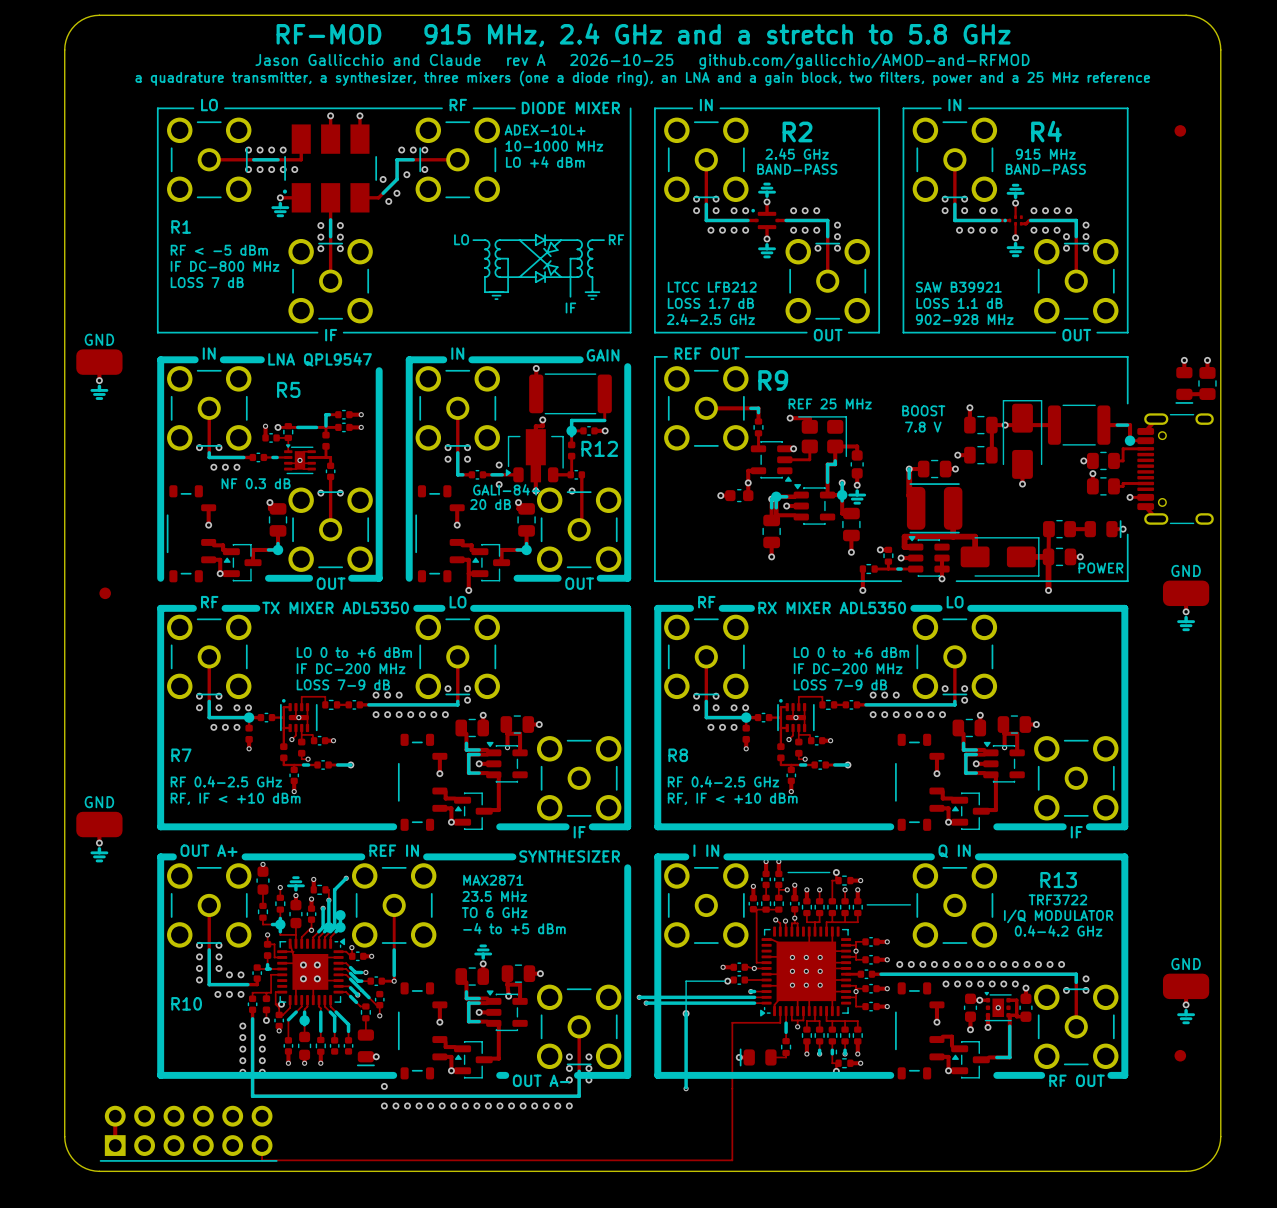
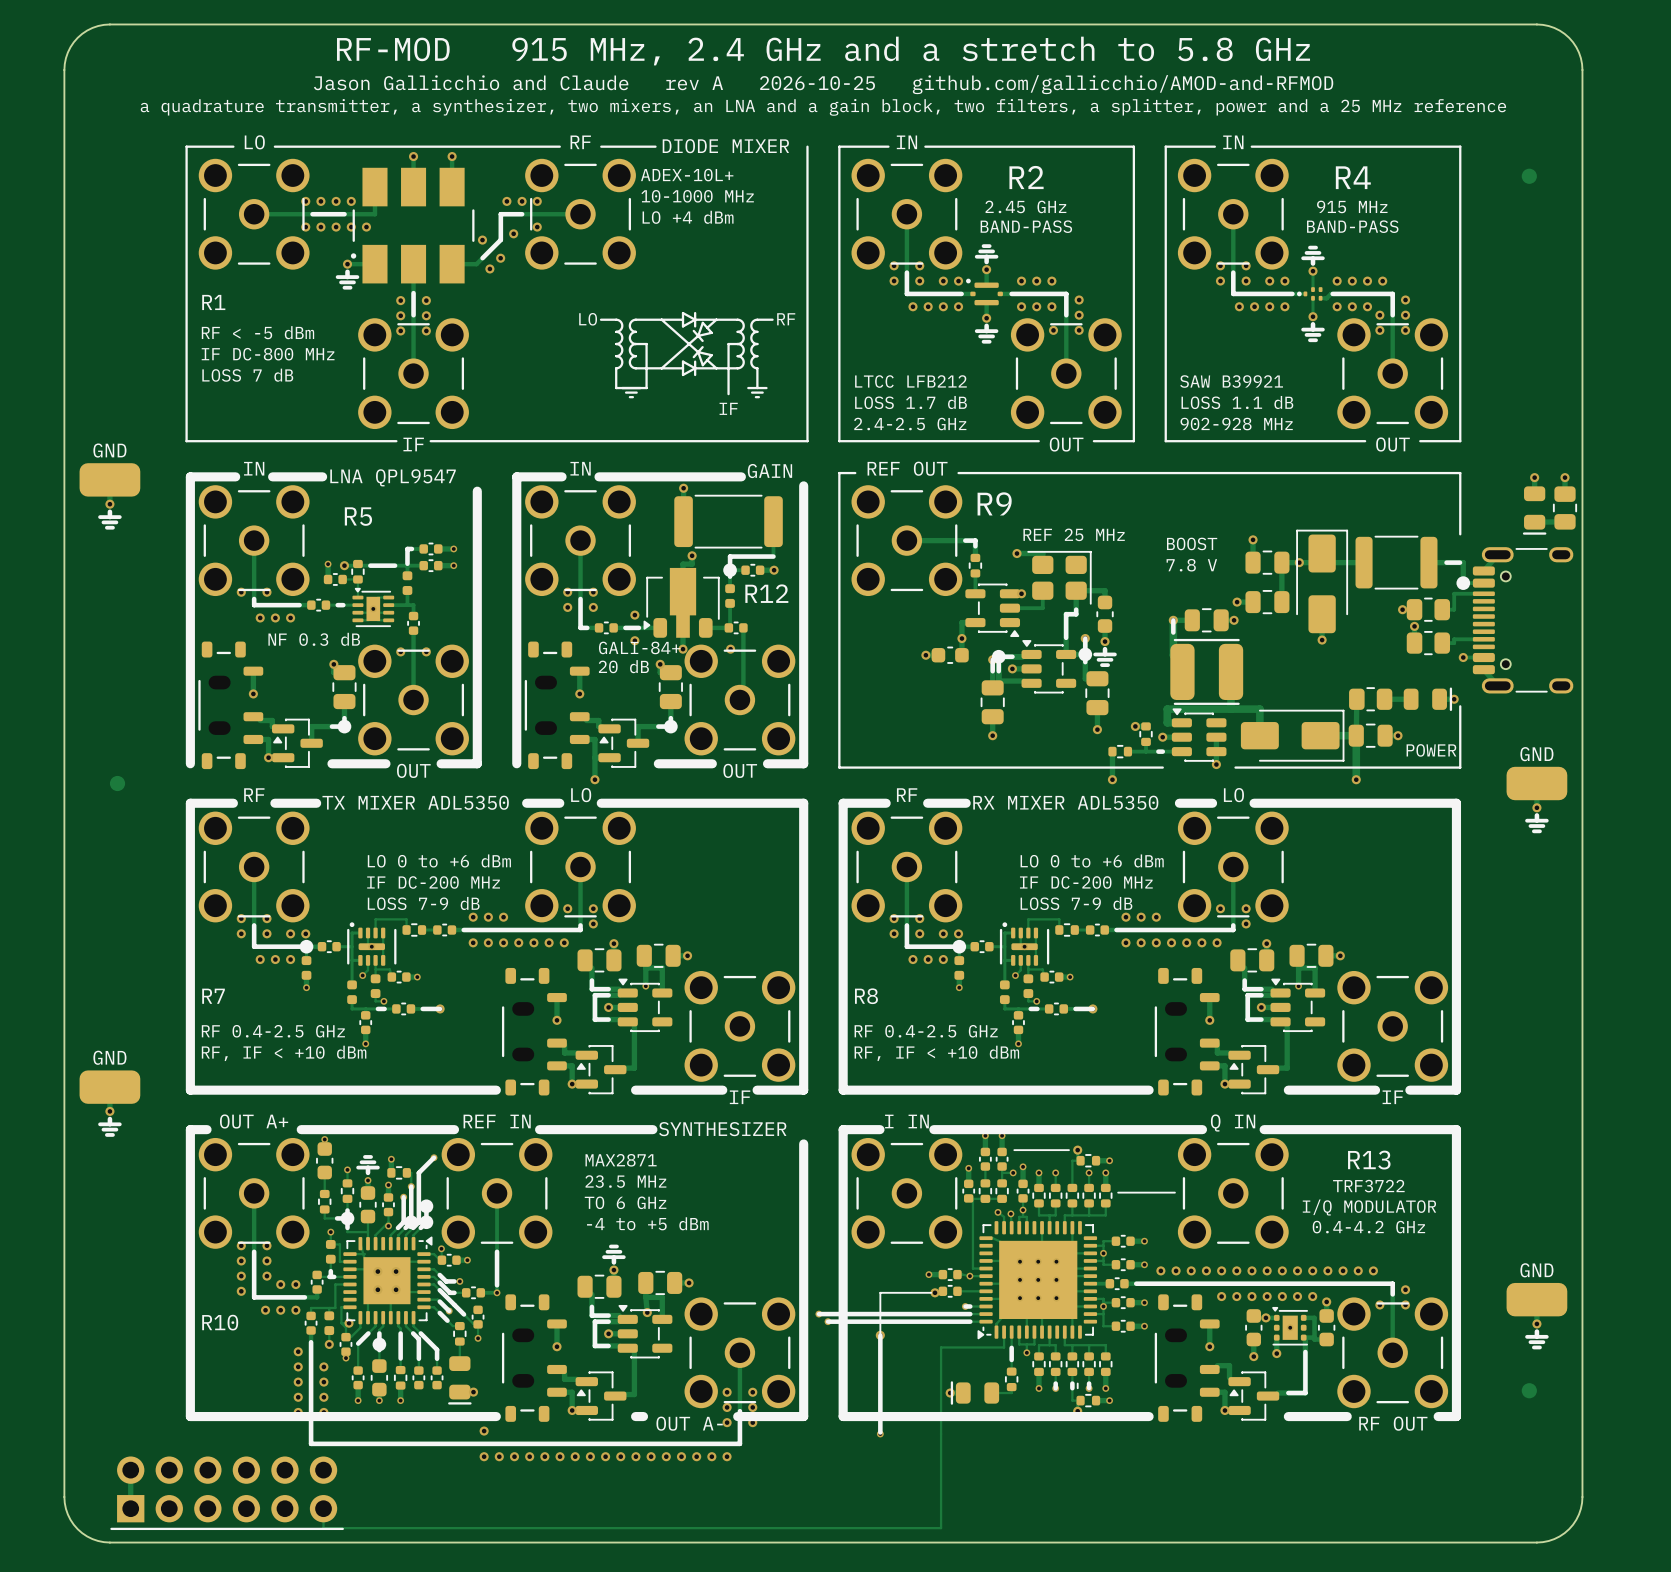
text: a quadrature transmitter, a synthesizer, three mixers (one a diode ring), an LNA and a gain block, two filters, power and a 25 MHz reference (642, 78) -> a quadrature transmitter, a synthesizer, two mixers, an LNA and a gain block, two filters, a splitter, power and a 25 MHz reference (823, 107)

